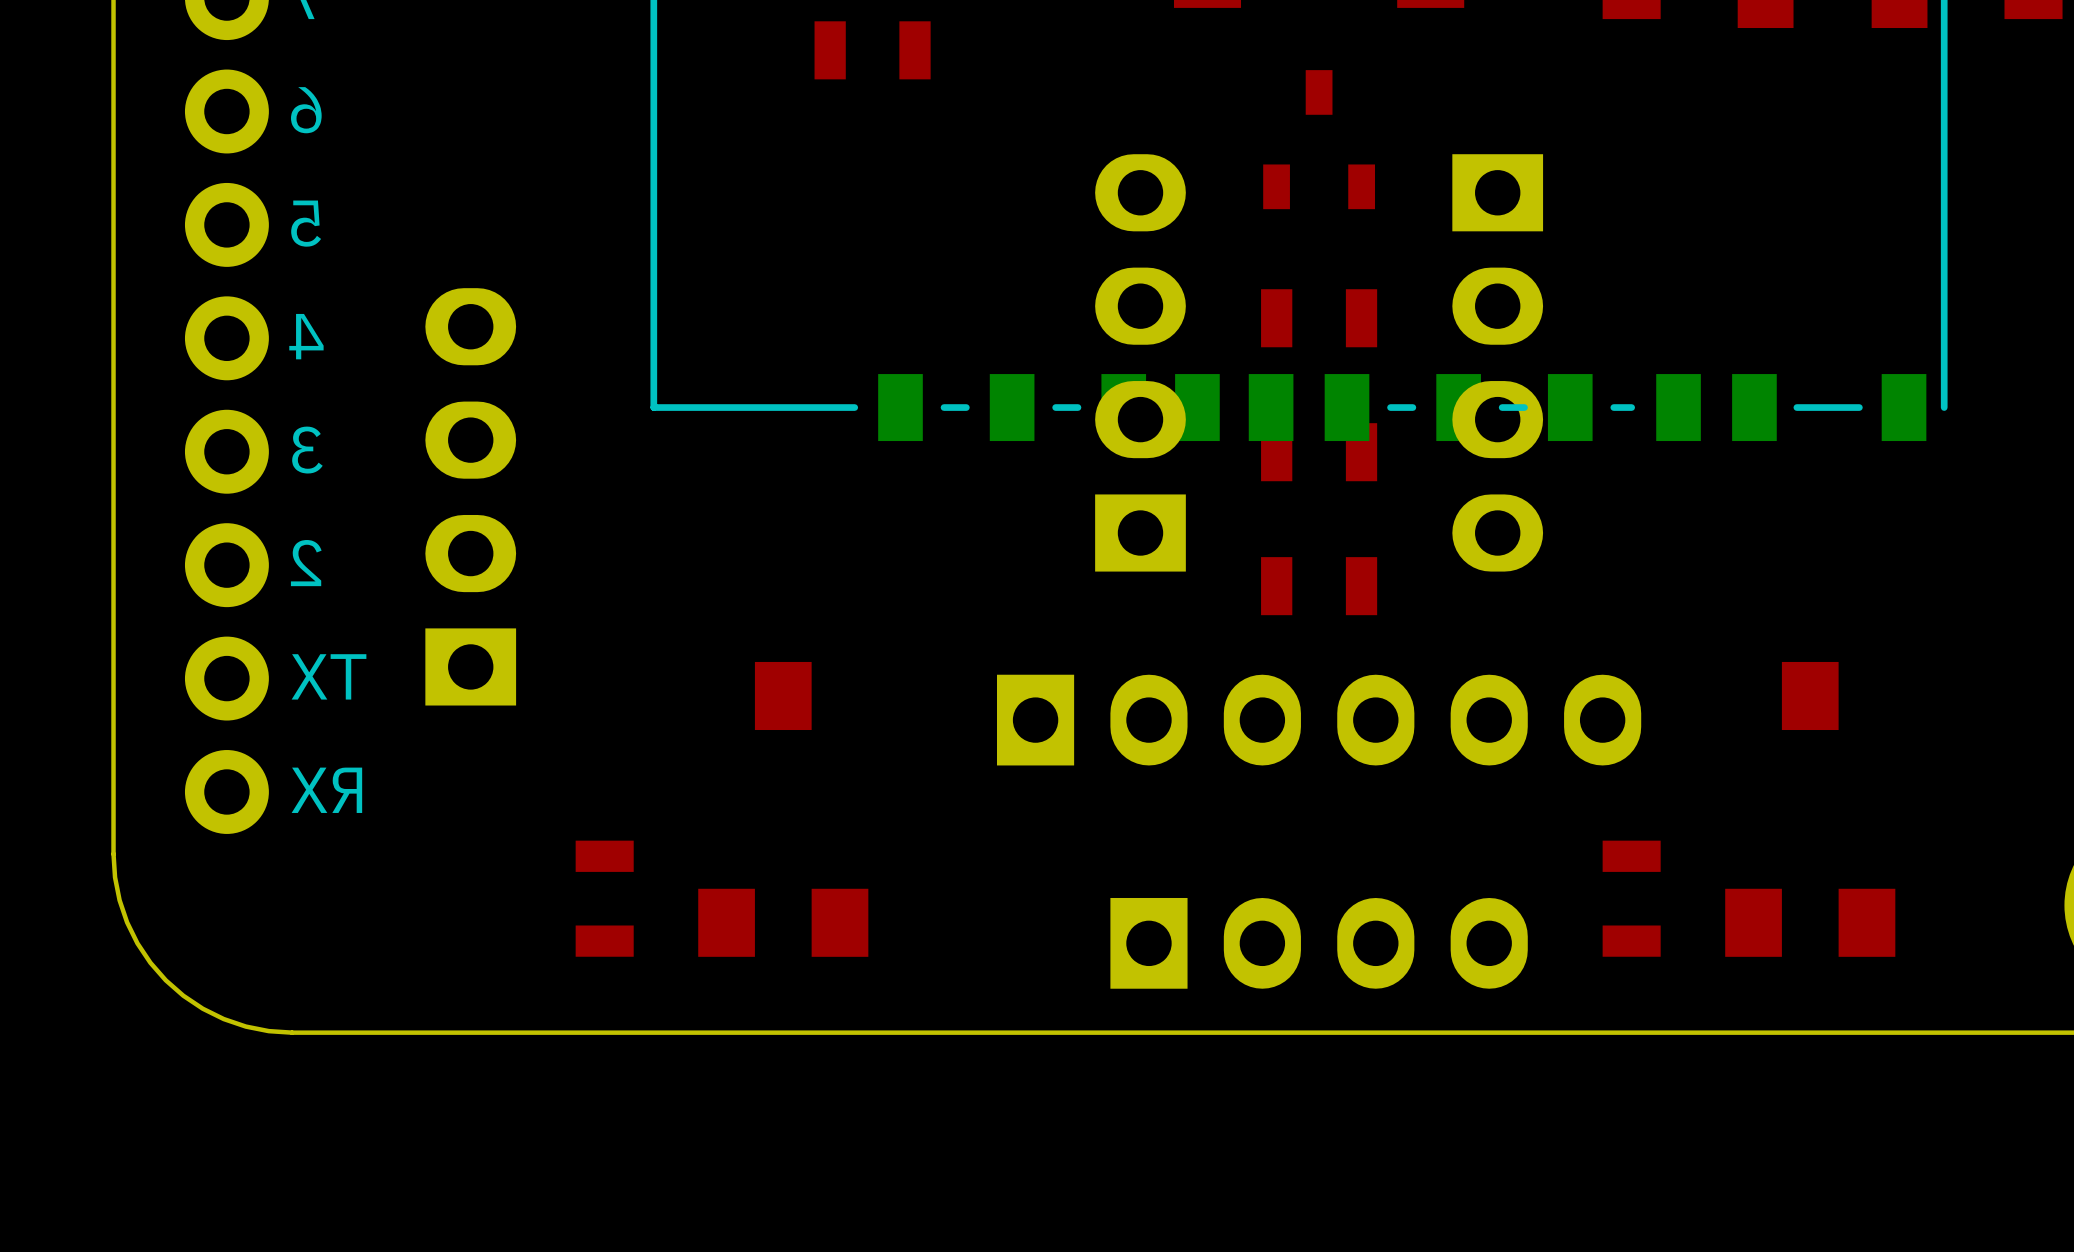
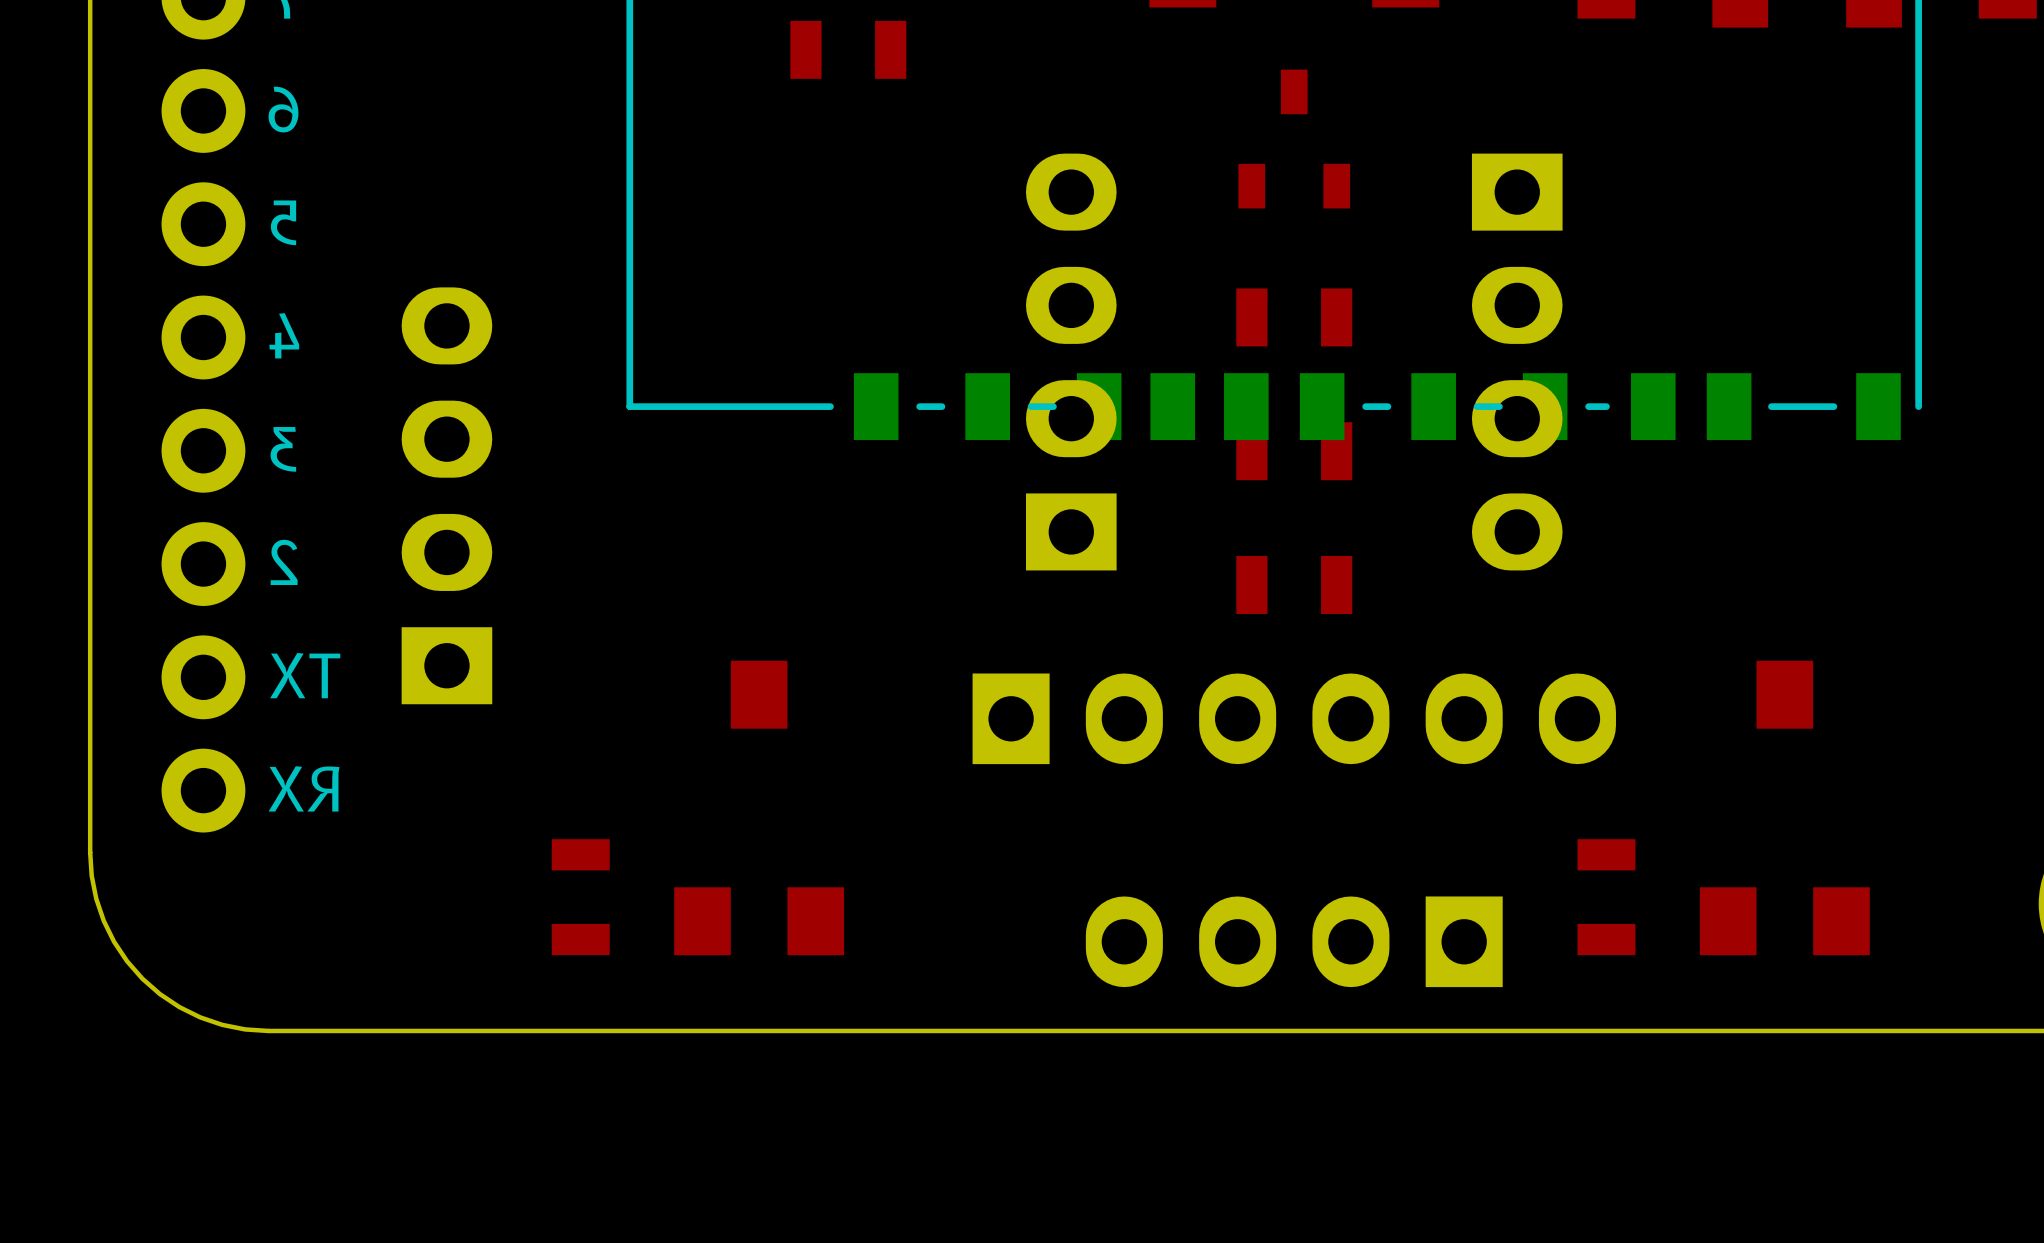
part position: (1140, 362) -> (1071, 362)
part position: (1497, 362) -> (1517, 362)
part rotation: 0° (1319, 943) -> 180° (1294, 941)

